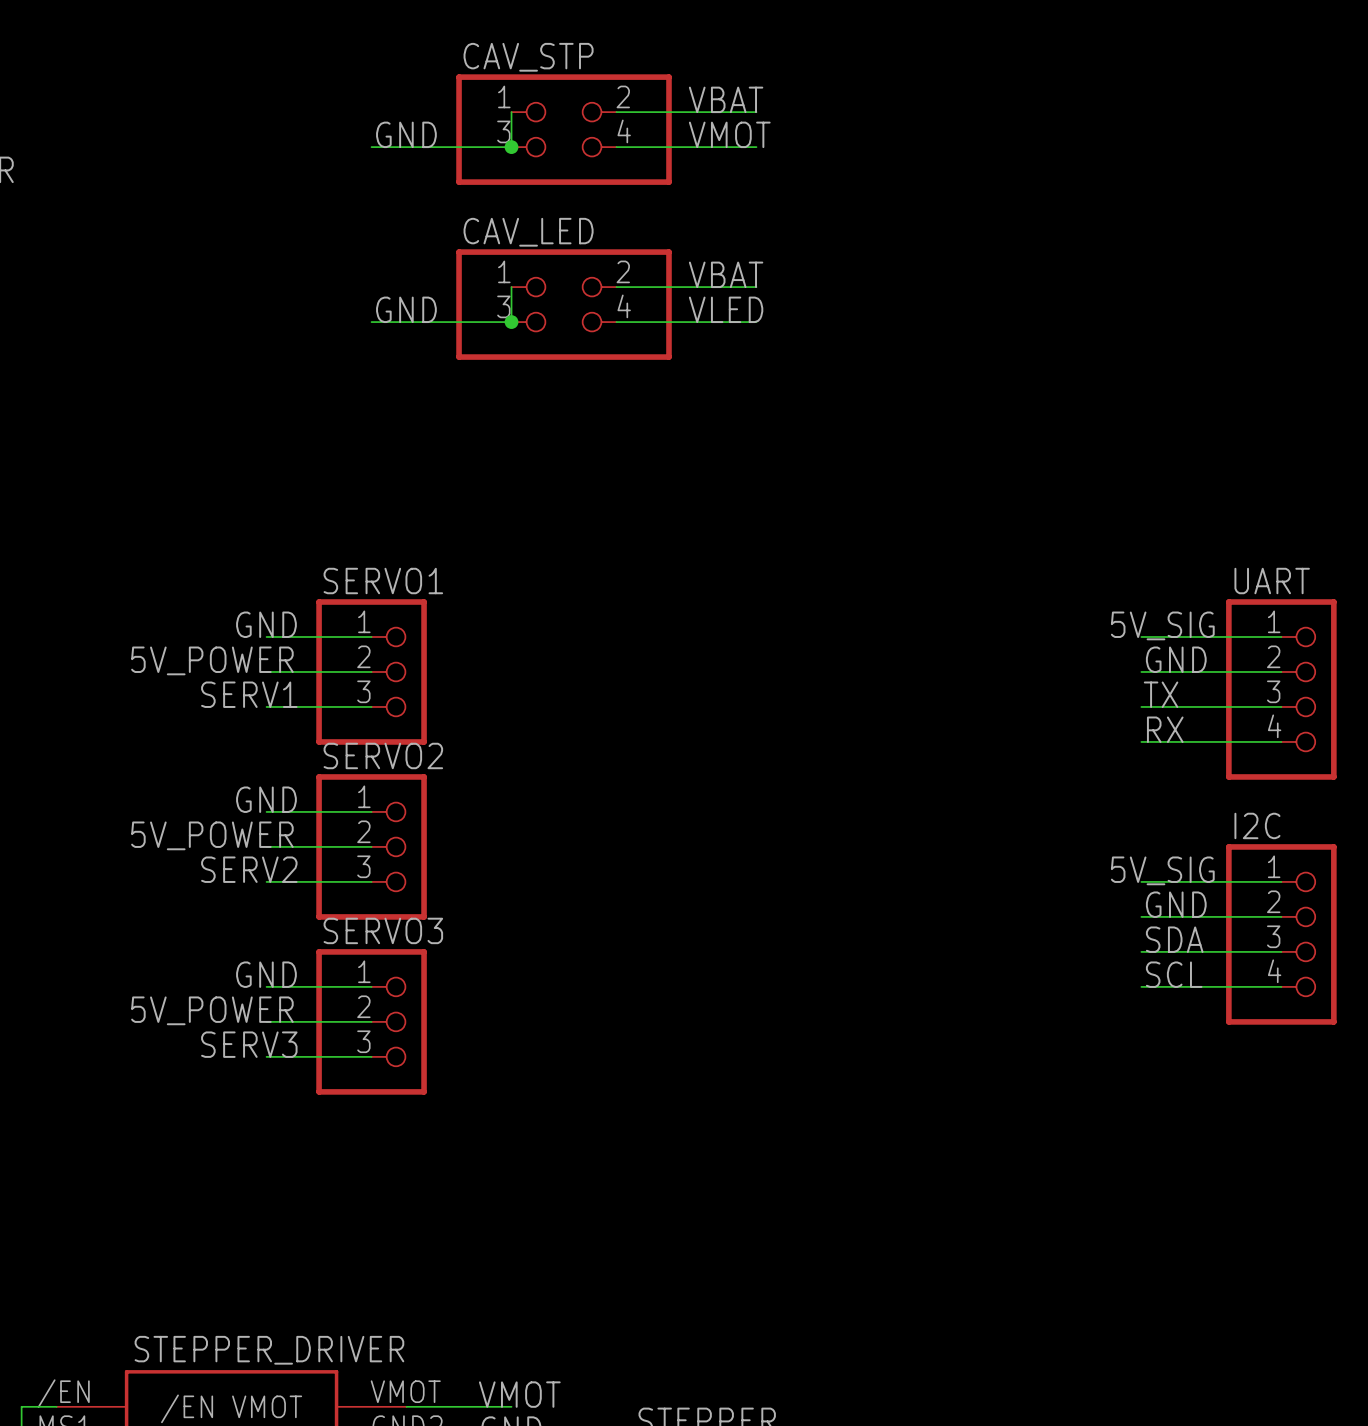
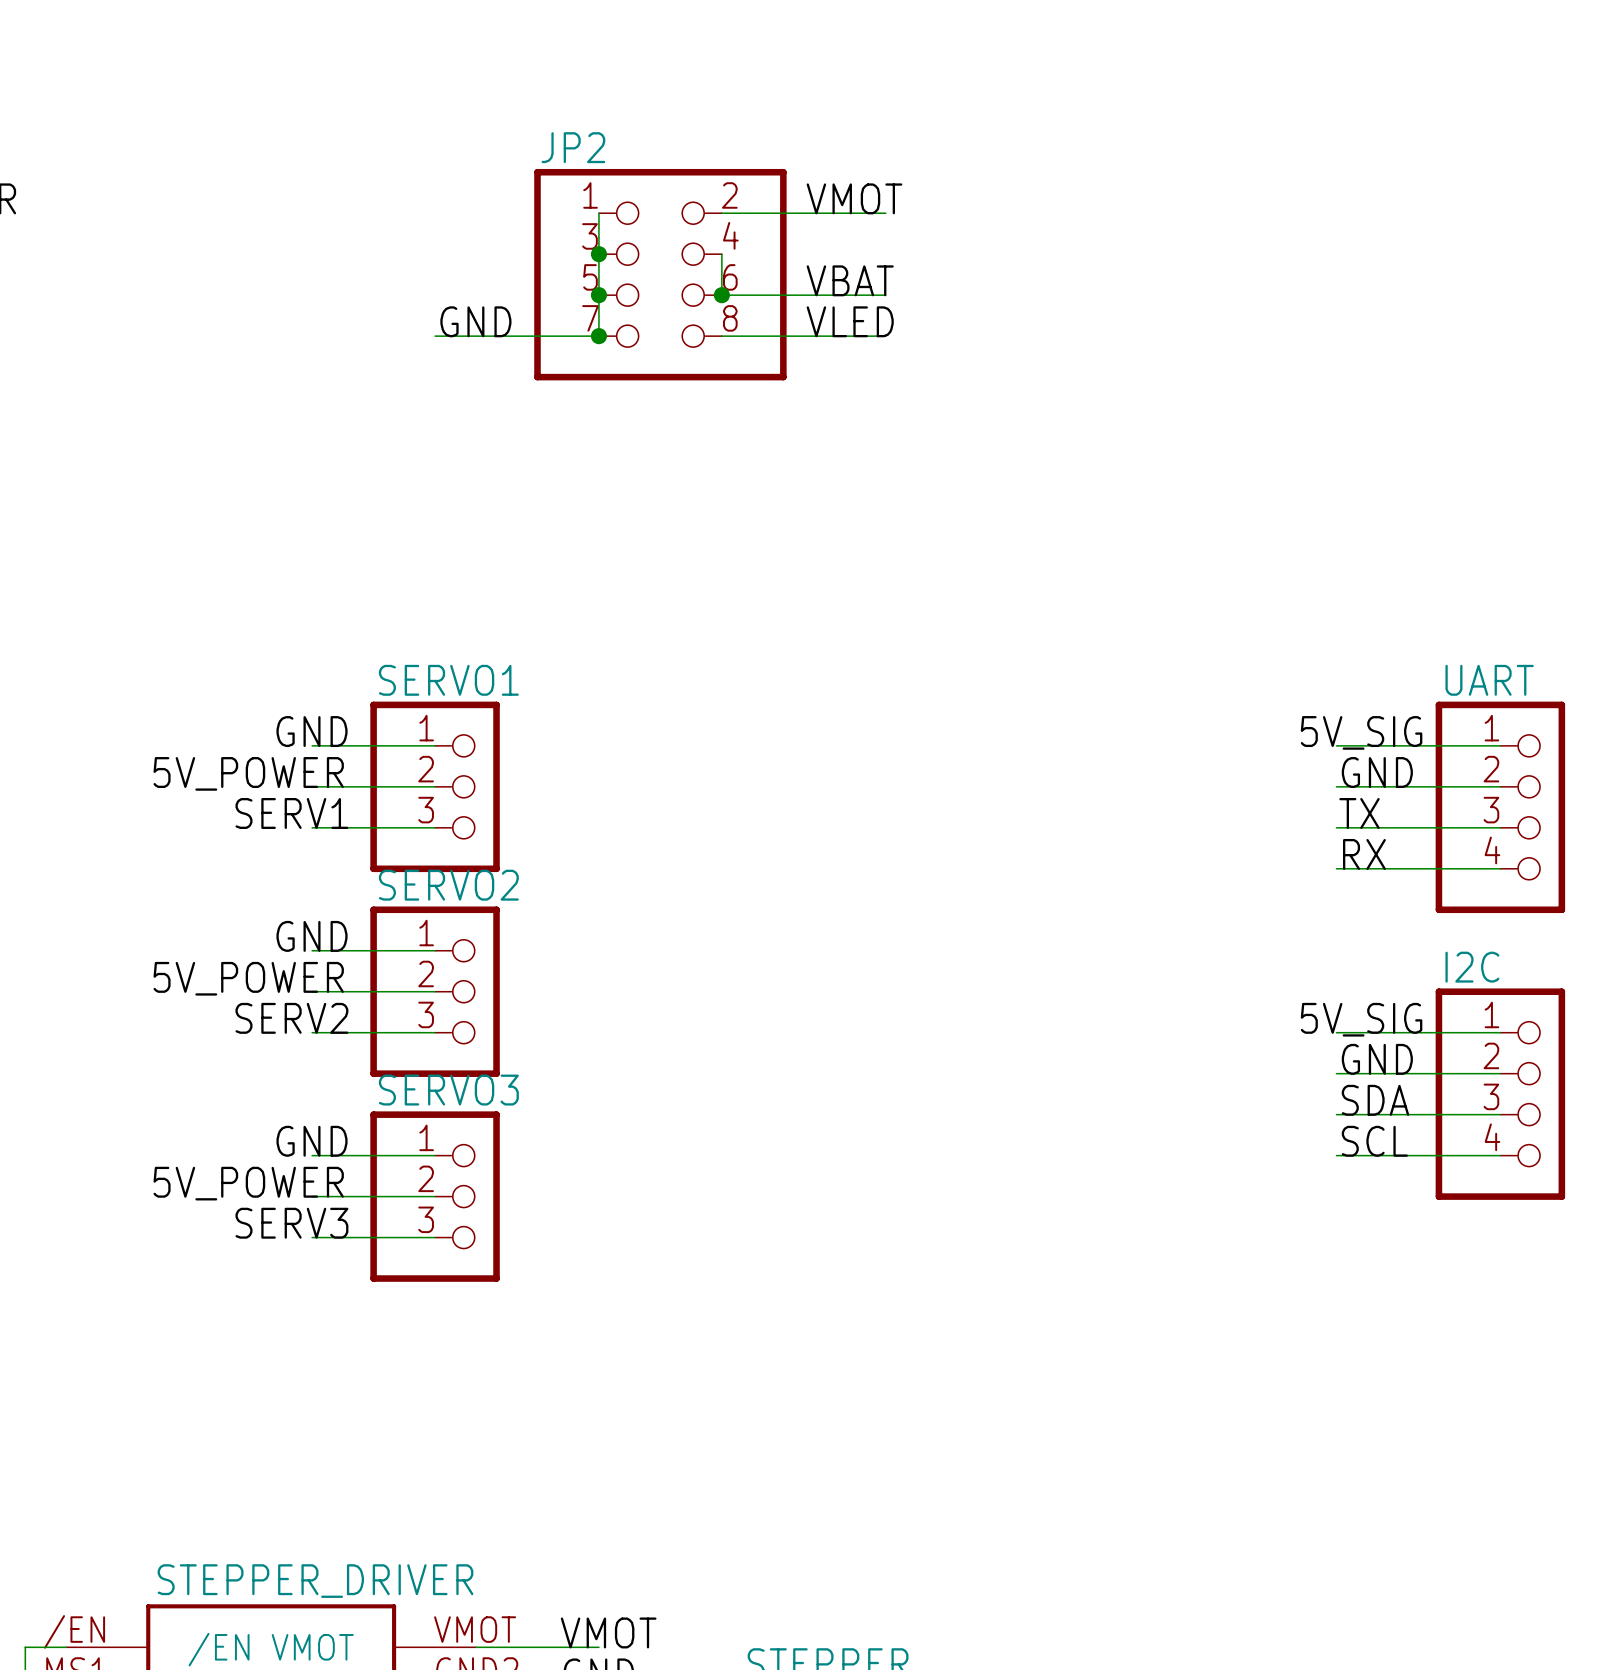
label position: VBAT (726, 99) -> VBAT (850, 280)
wire: (511, 112) (511, 147) (371, 147) -> none
wire: (616, 112) (756, 112) -> none
CAV_STP: (564, 129) -> none
label: GND (406, 134) -> none
label position: VMOT (729, 134) -> VMOT (854, 198)
junction: (511, 147) -> none
wire: (616, 147) (756, 147) -> (721, 213) (885, 213)
wire: none -> (598, 213) (598, 336) (435, 336)
junction: none -> (598, 254)
wire: none -> (721, 254) (721, 295) (885, 295)
JP2: none -> (660, 274)
junction: none -> (598, 295)
junction: none -> (721, 295)
label: VBAT (726, 274) -> VLED (850, 321)
wire: (511, 287) (511, 322) (371, 322) -> none
junction: none -> (598, 336)
CAV_LED: (564, 304) -> none
label position: GND (406, 309) -> GND (475, 321)
label: VLED (726, 309) -> none
junction: (511, 322) -> none
wire: (616, 322) (756, 322) -> none

